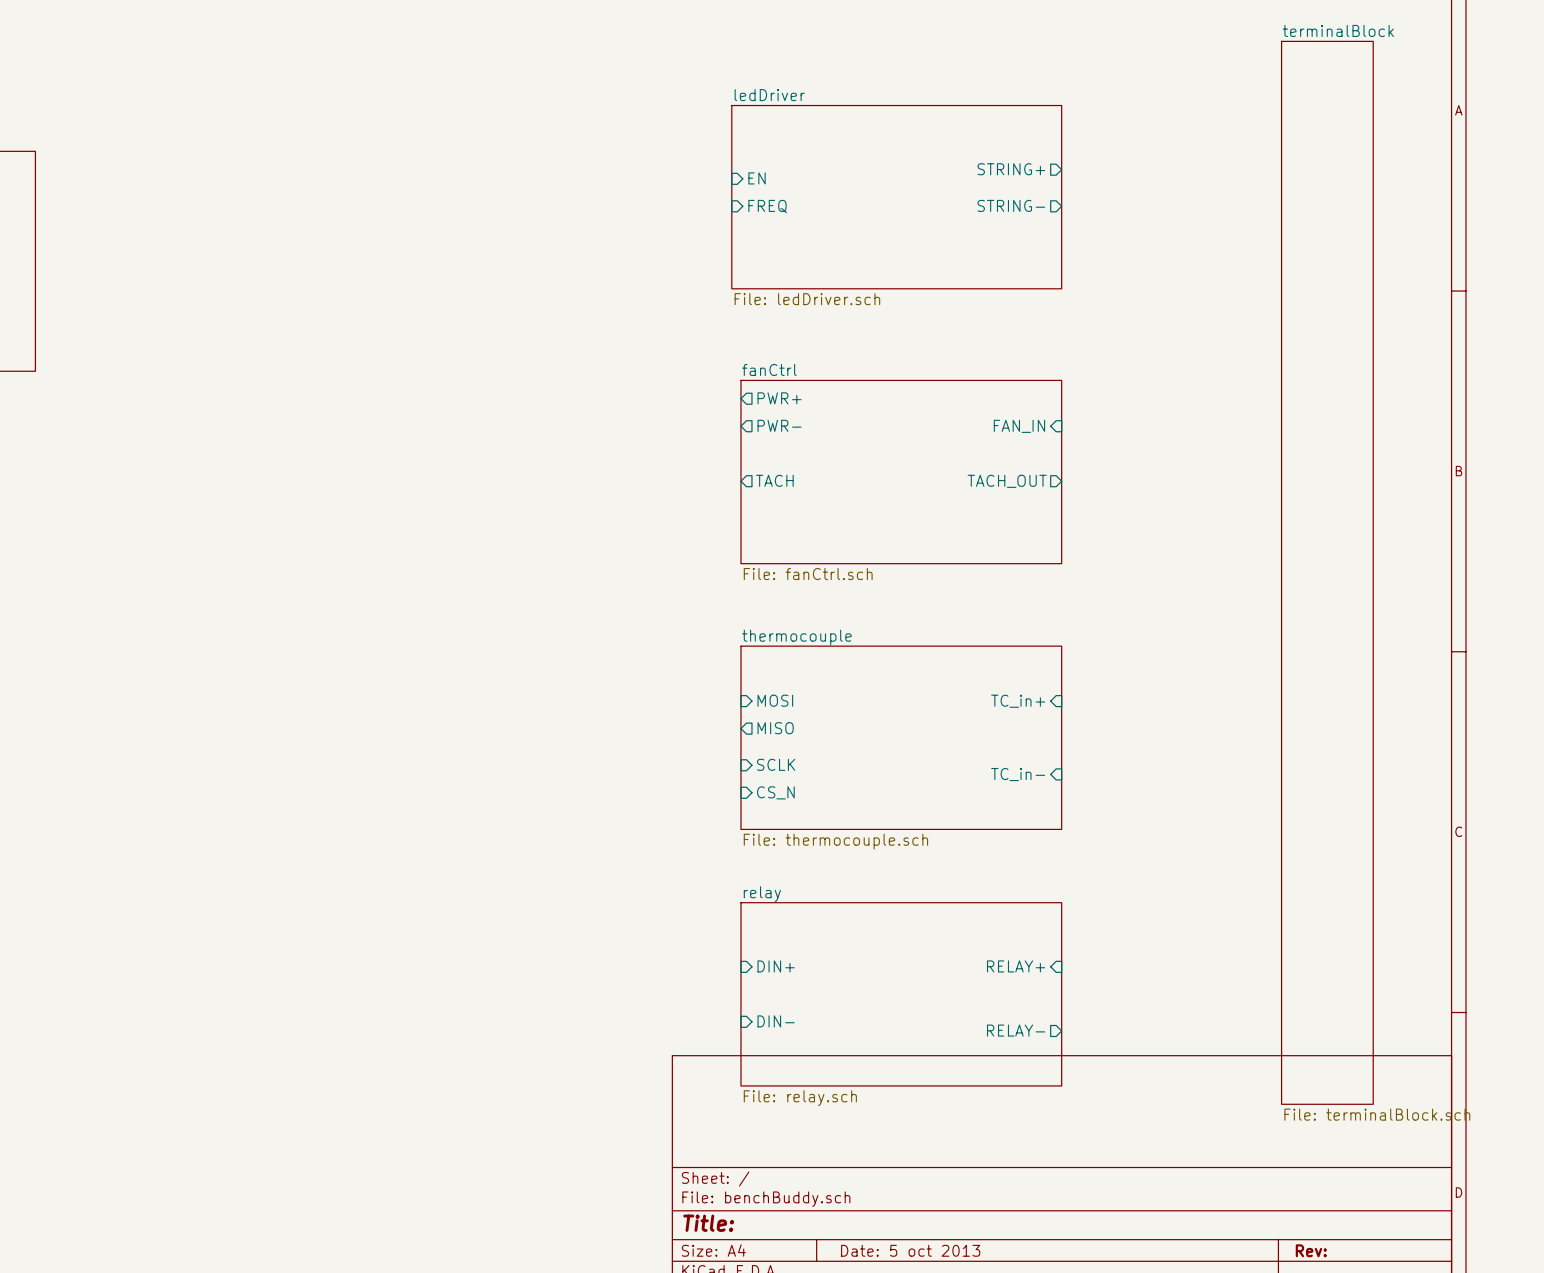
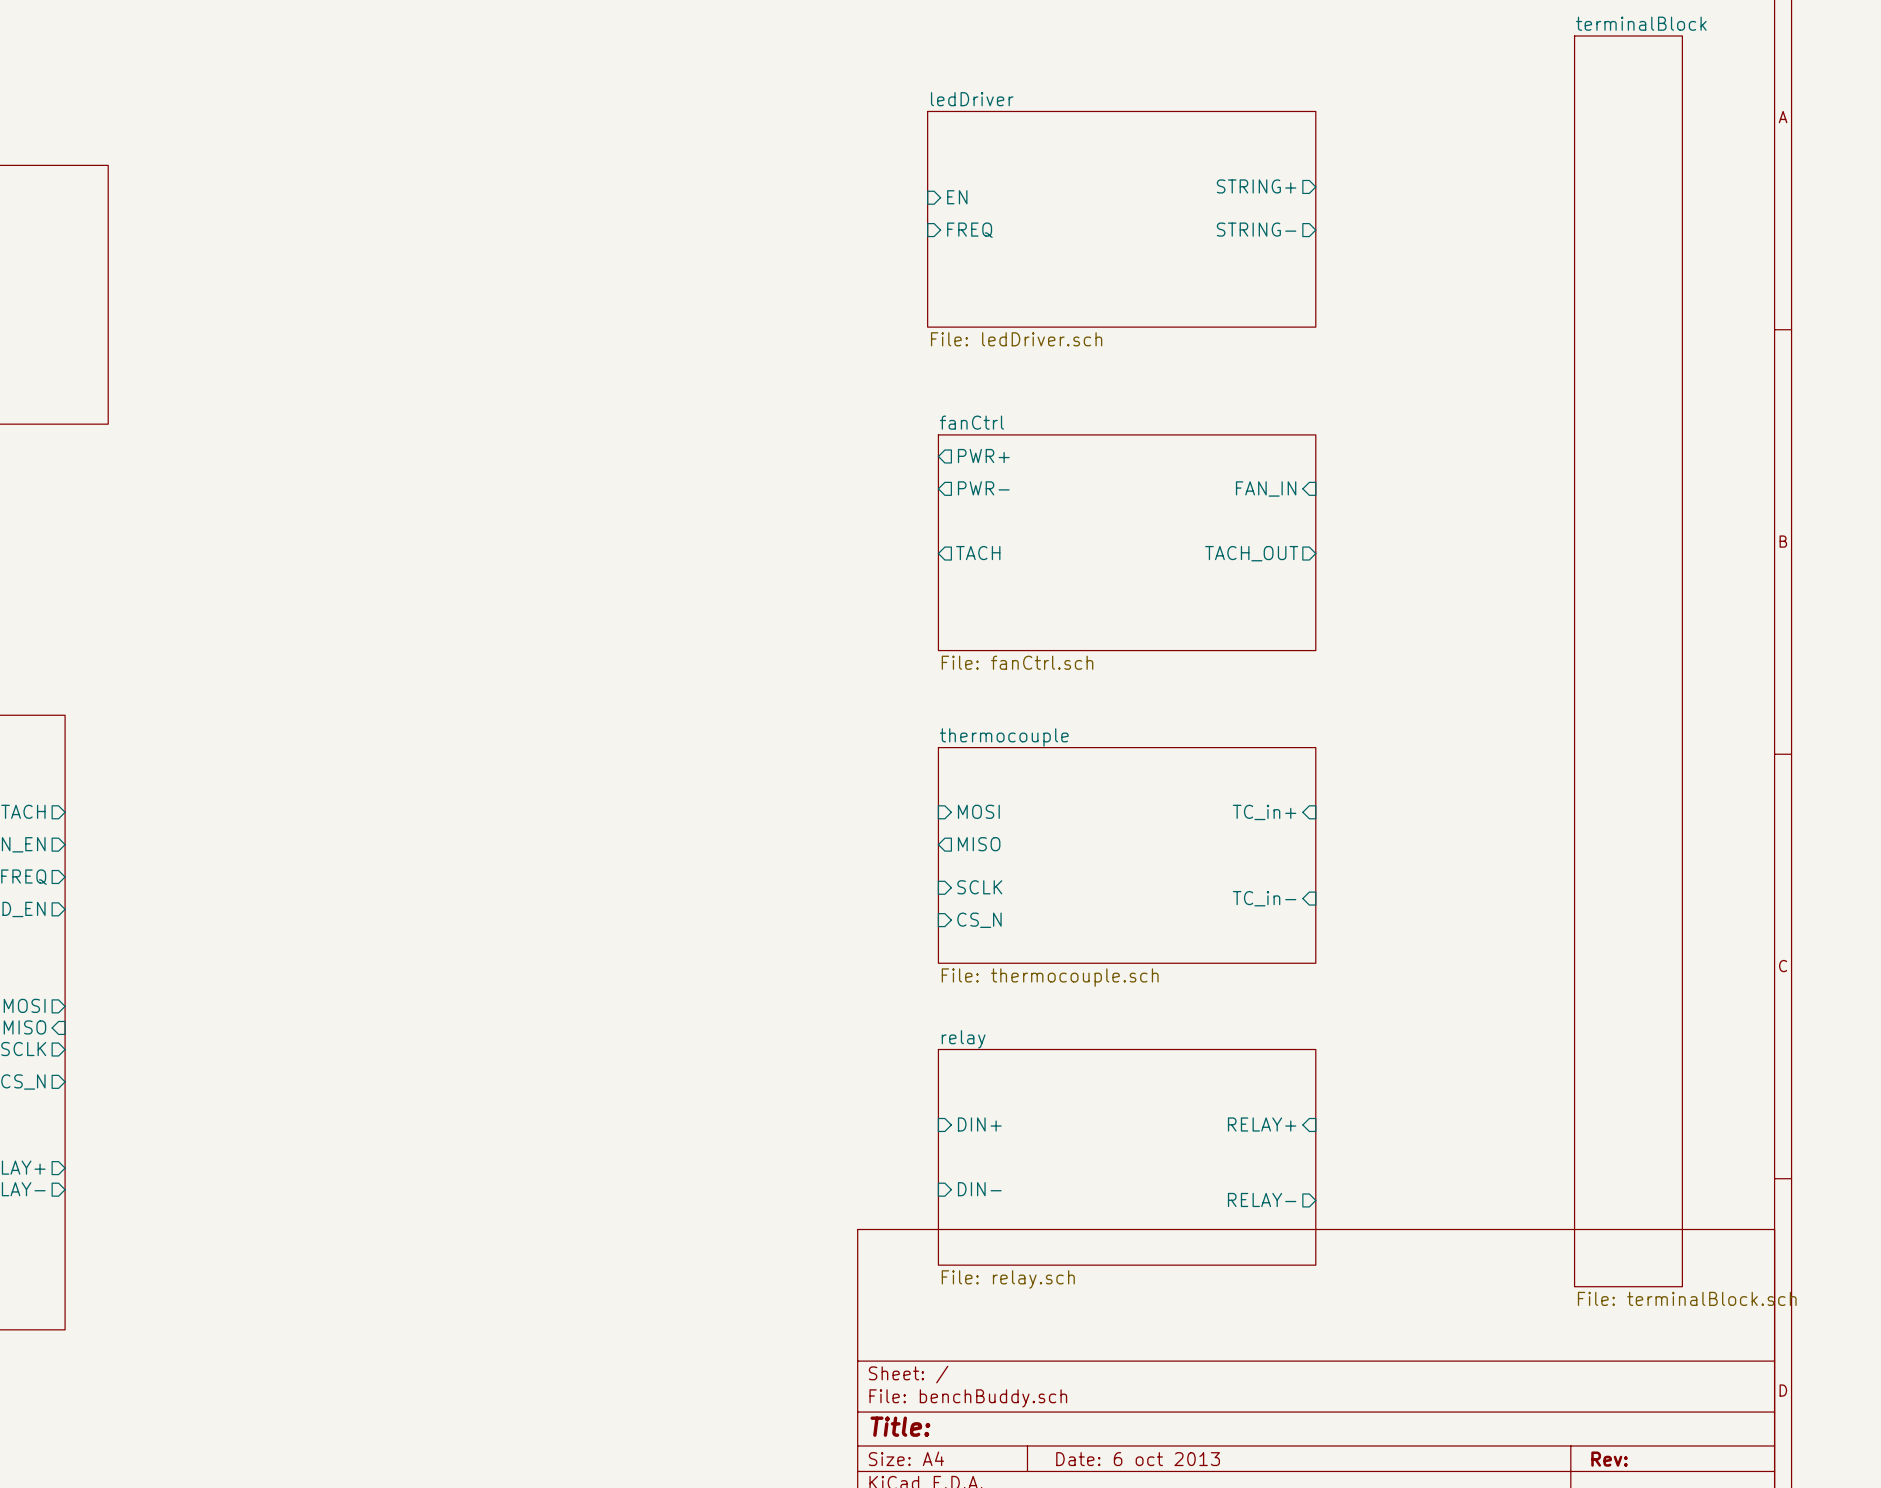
title block: Date: 5 oct 2013 (910, 1250) -> Date: 6 oct 2013 (1138, 1459)

